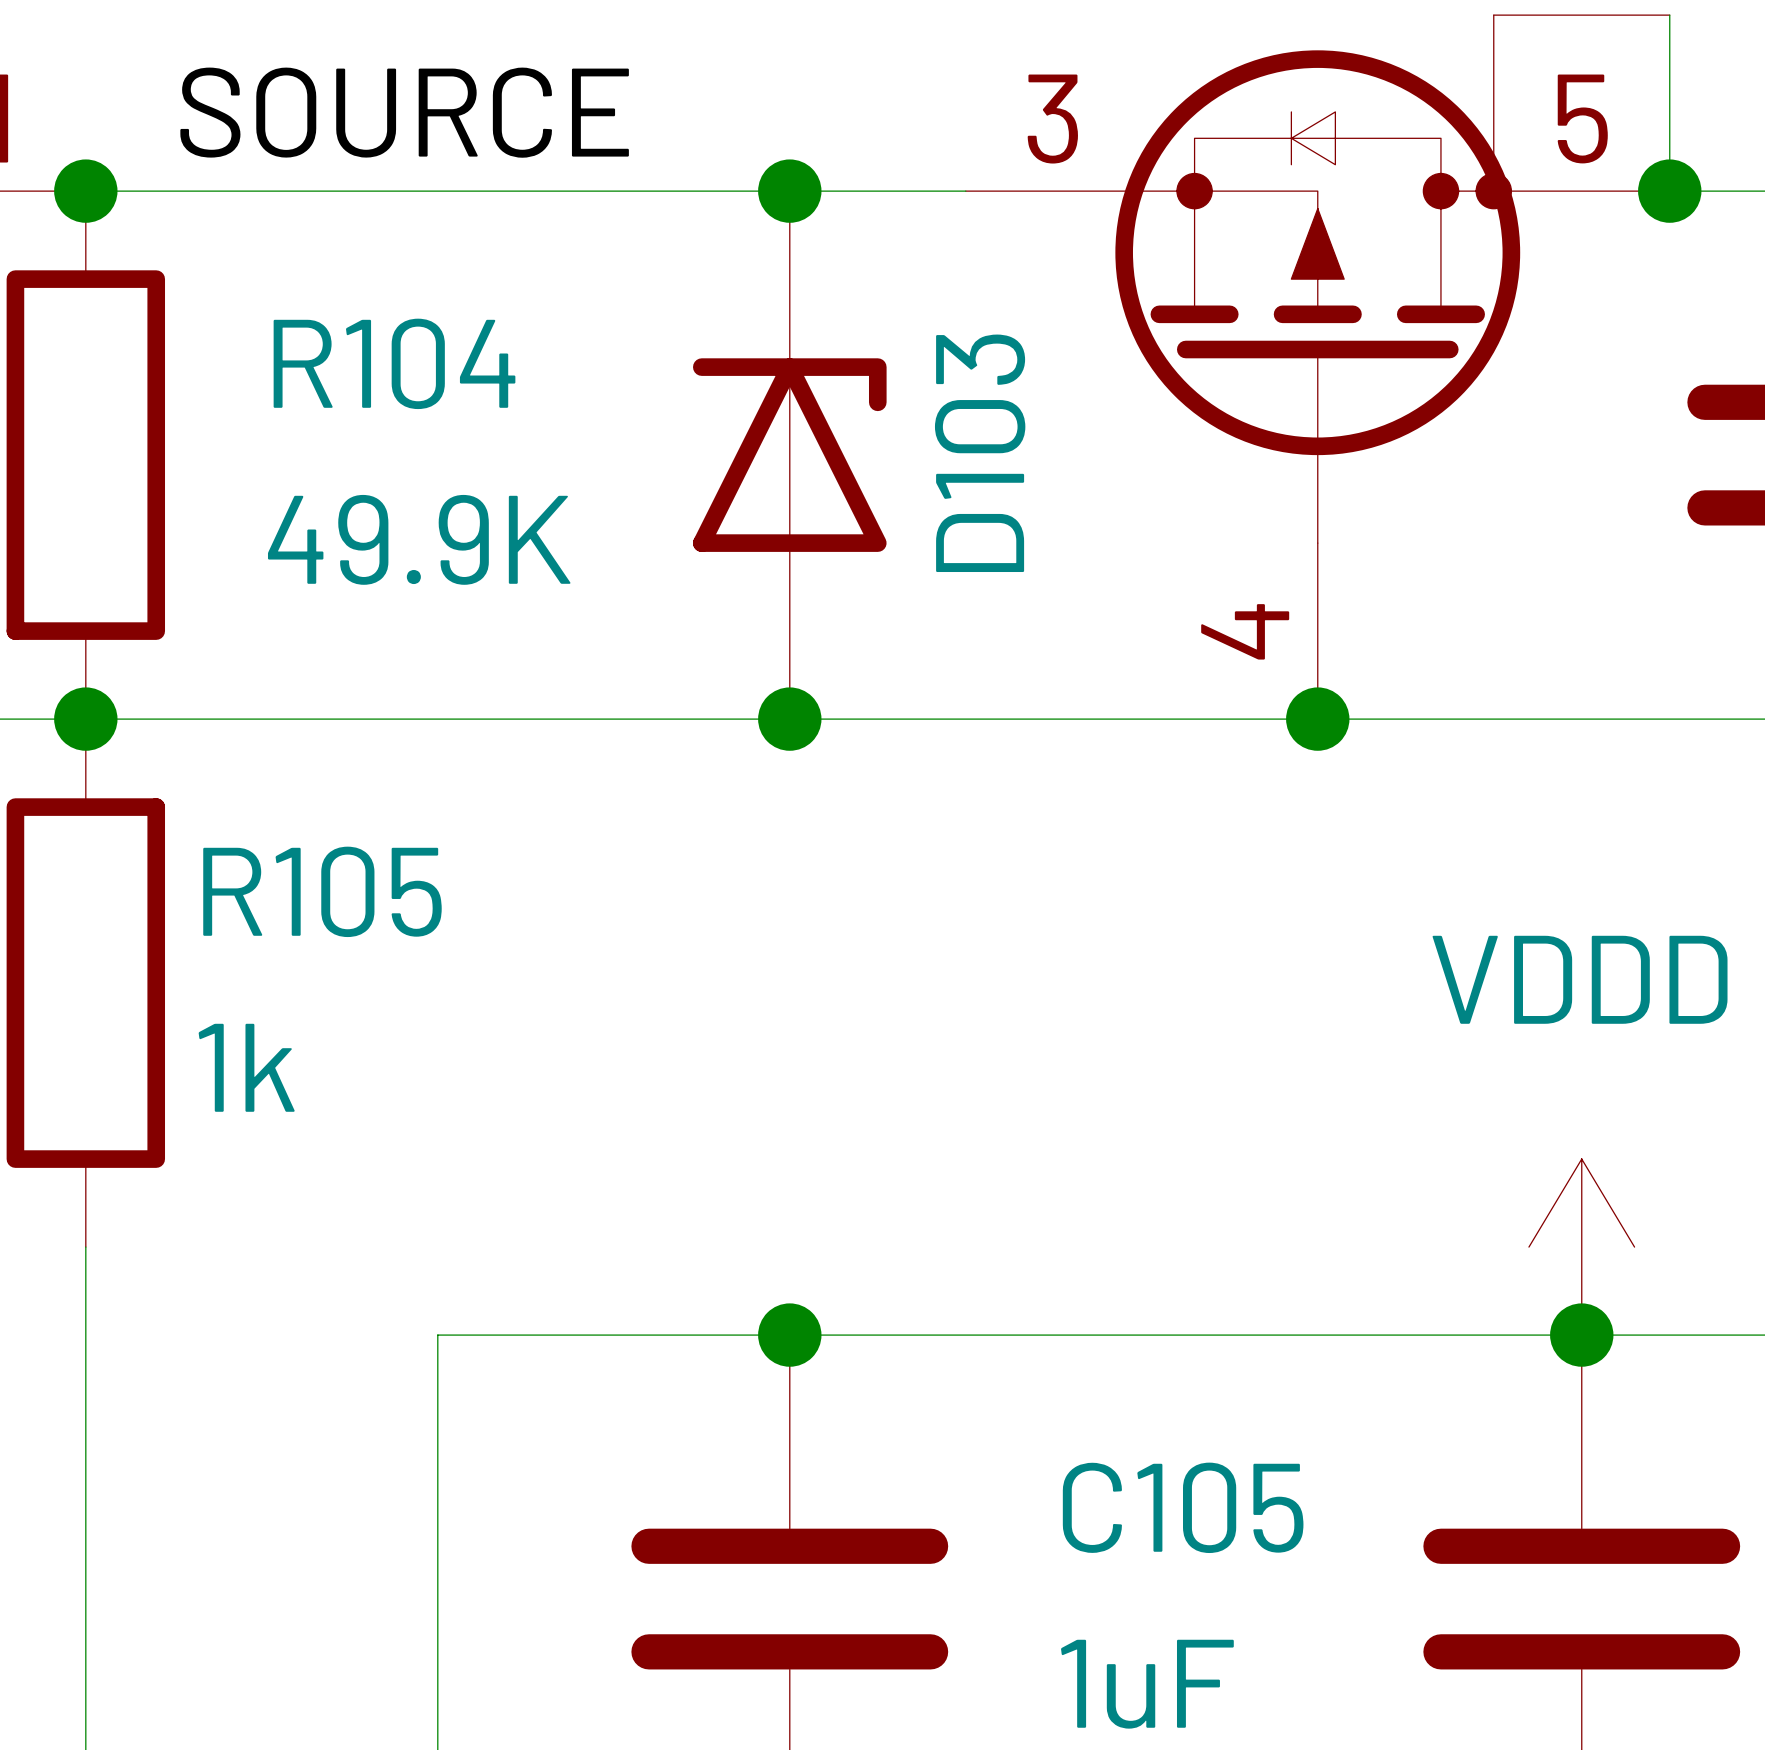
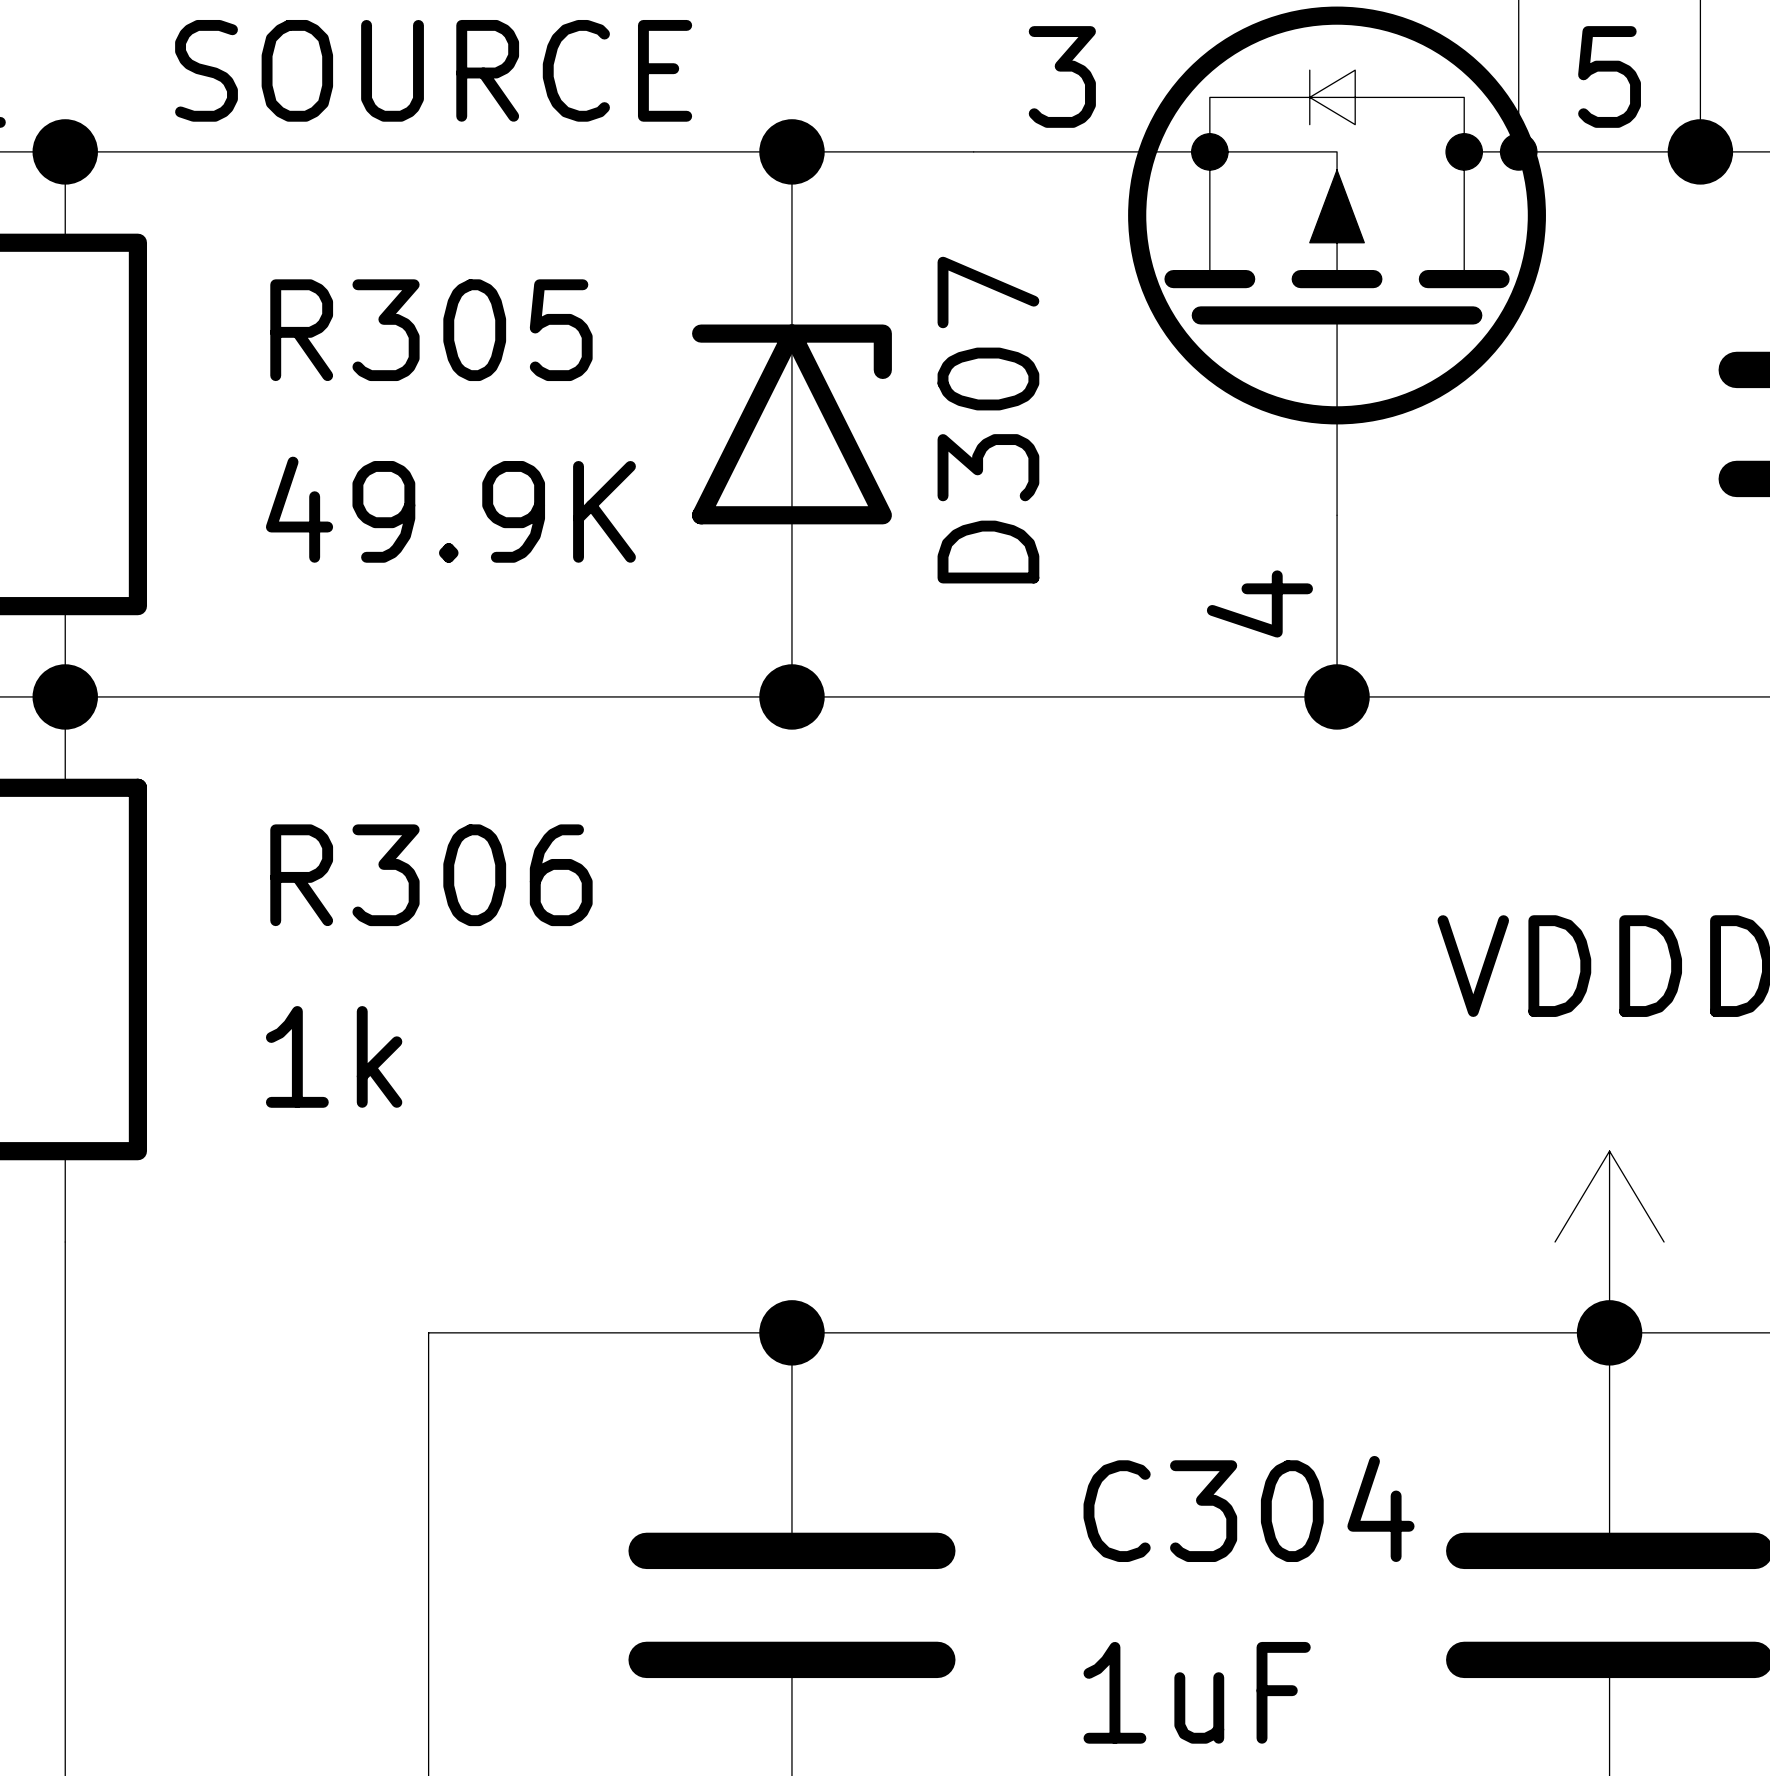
R104 name: R104 (394, 363) -> R305 (431, 330)
D103 name: D103 (980, 453) -> D307 (988, 420)
R105 name: R105 (322, 891) -> R306 (431, 875)
R105 value position: 1k (246, 1067) -> 1k (334, 1056)
C105 name: C105 (1183, 1507) -> C304 (1249, 1508)

